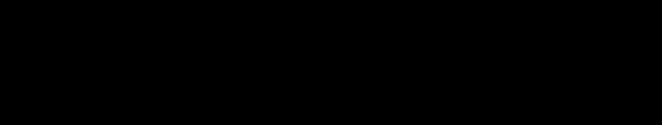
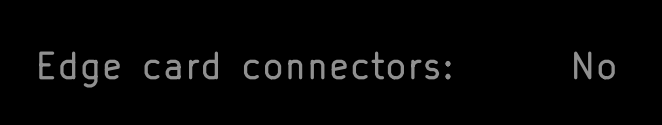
text: none -> No (594, 65)
text: none -> Edge card connectors: (245, 69)

